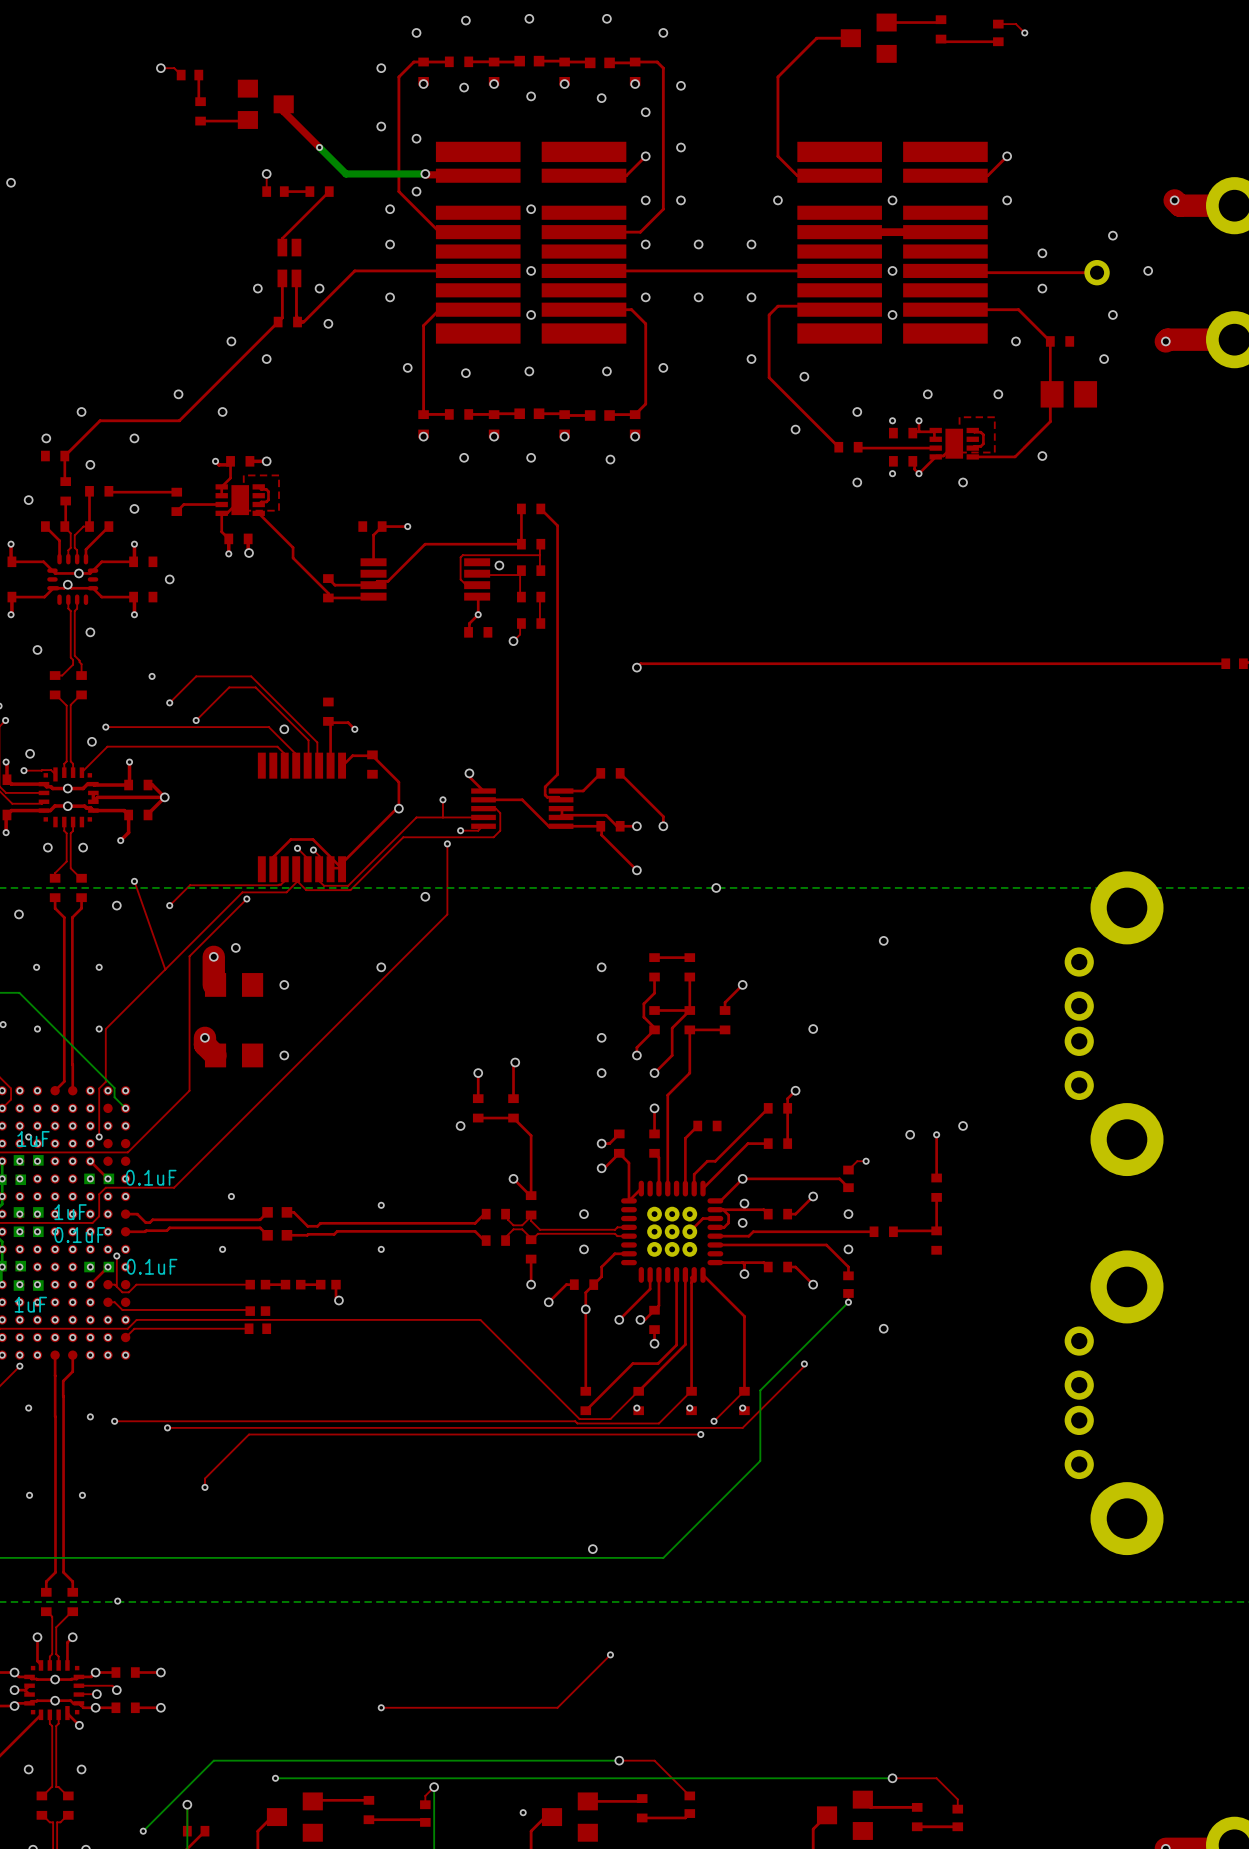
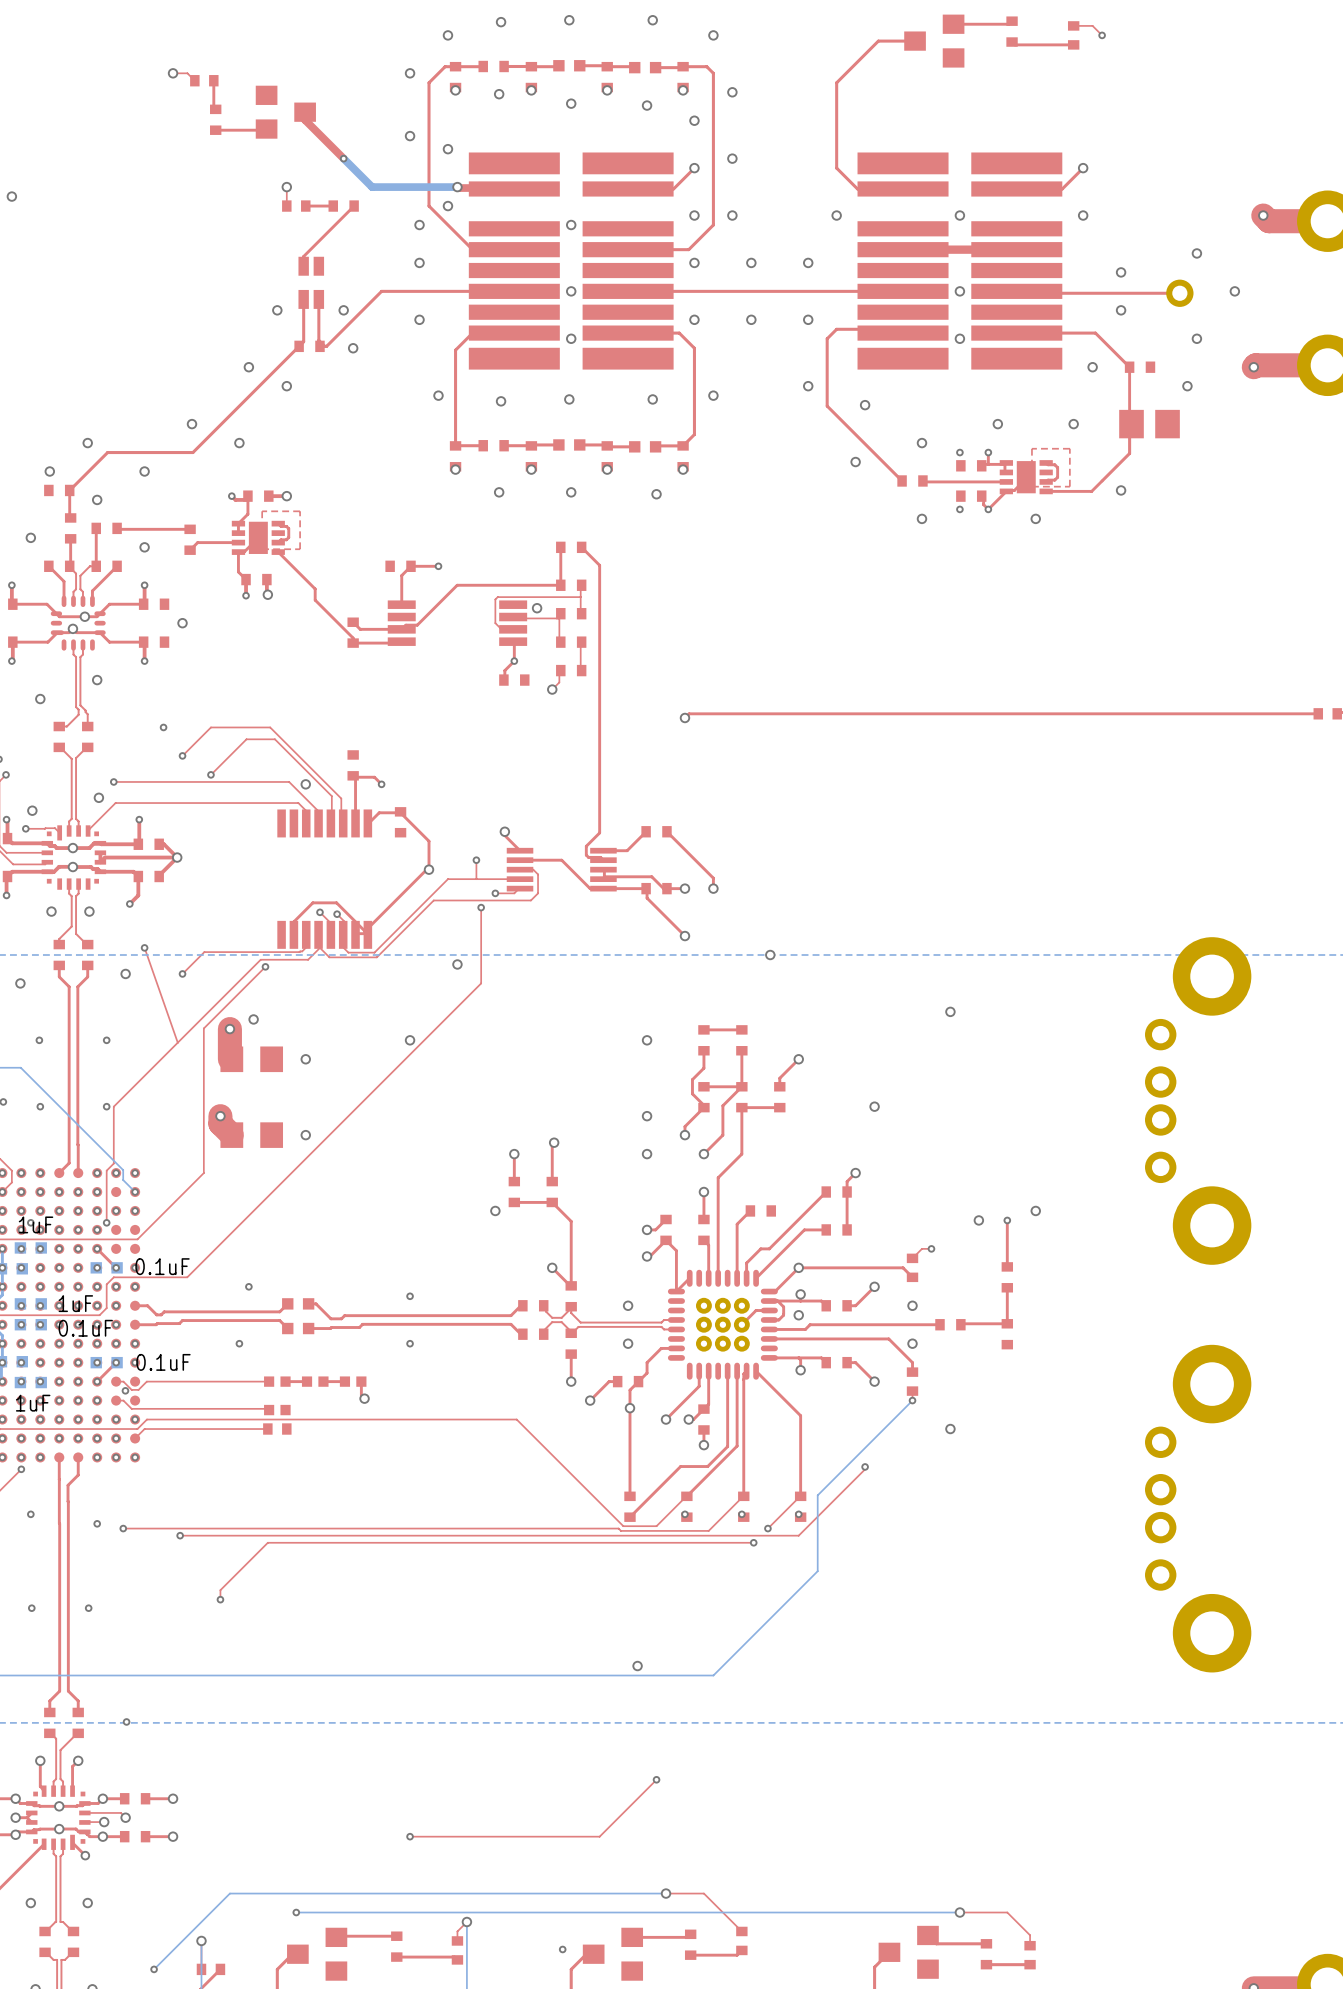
top track: (116, 1256) (116, 1286) -> none
via position: (116, 1256) -> (125, 1390)

